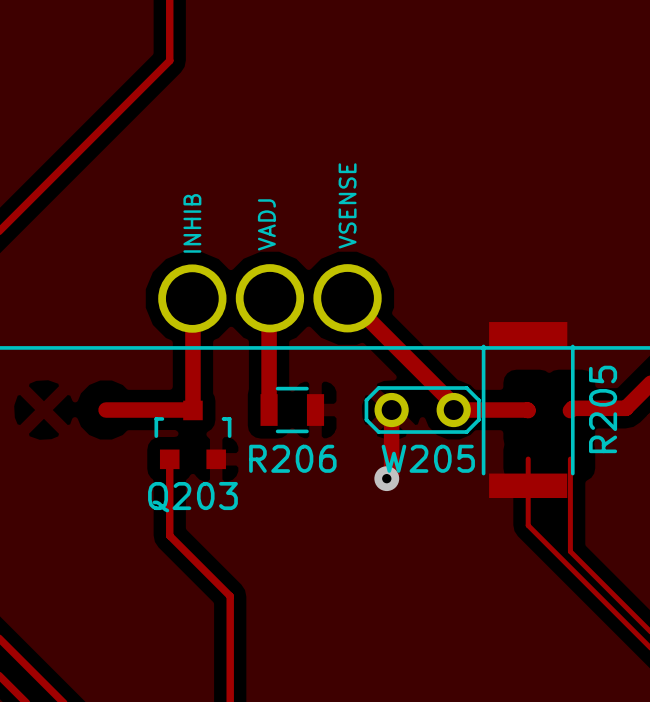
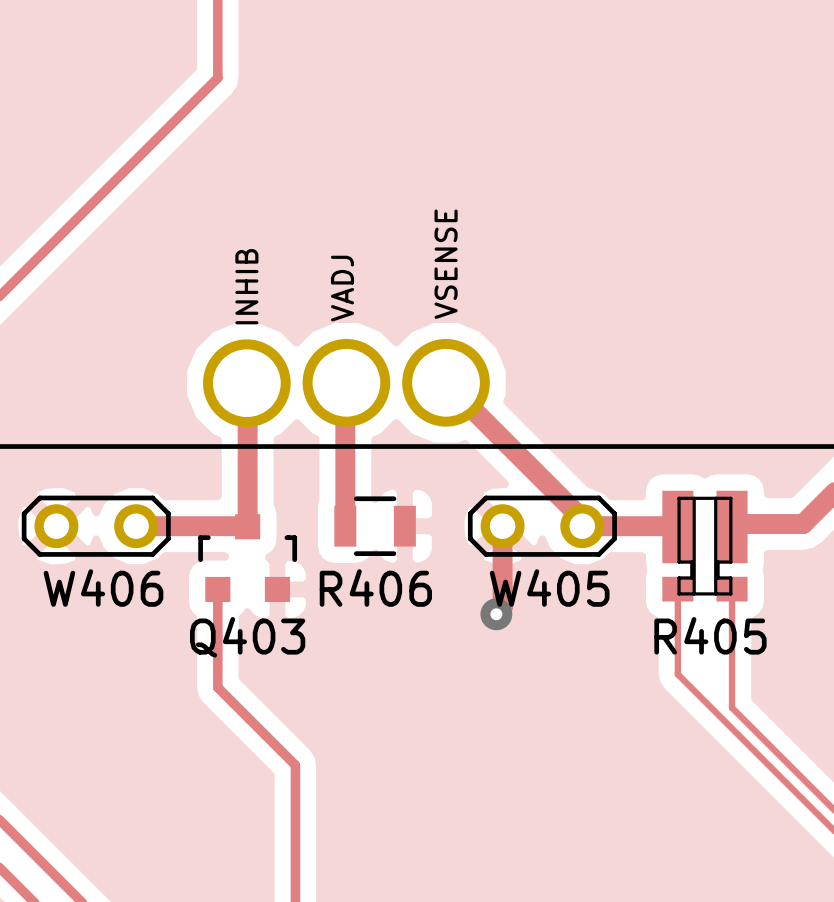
W406: none -> (96, 526)
R205: (528, 410) -> none
R405: none -> (704, 546)
R206 name: R206 (292, 458) -> R406 (375, 588)
W205 name: W205 (428, 458) -> W405 (549, 588)
Q203 name: Q203 (192, 497) -> Q403 (247, 637)

